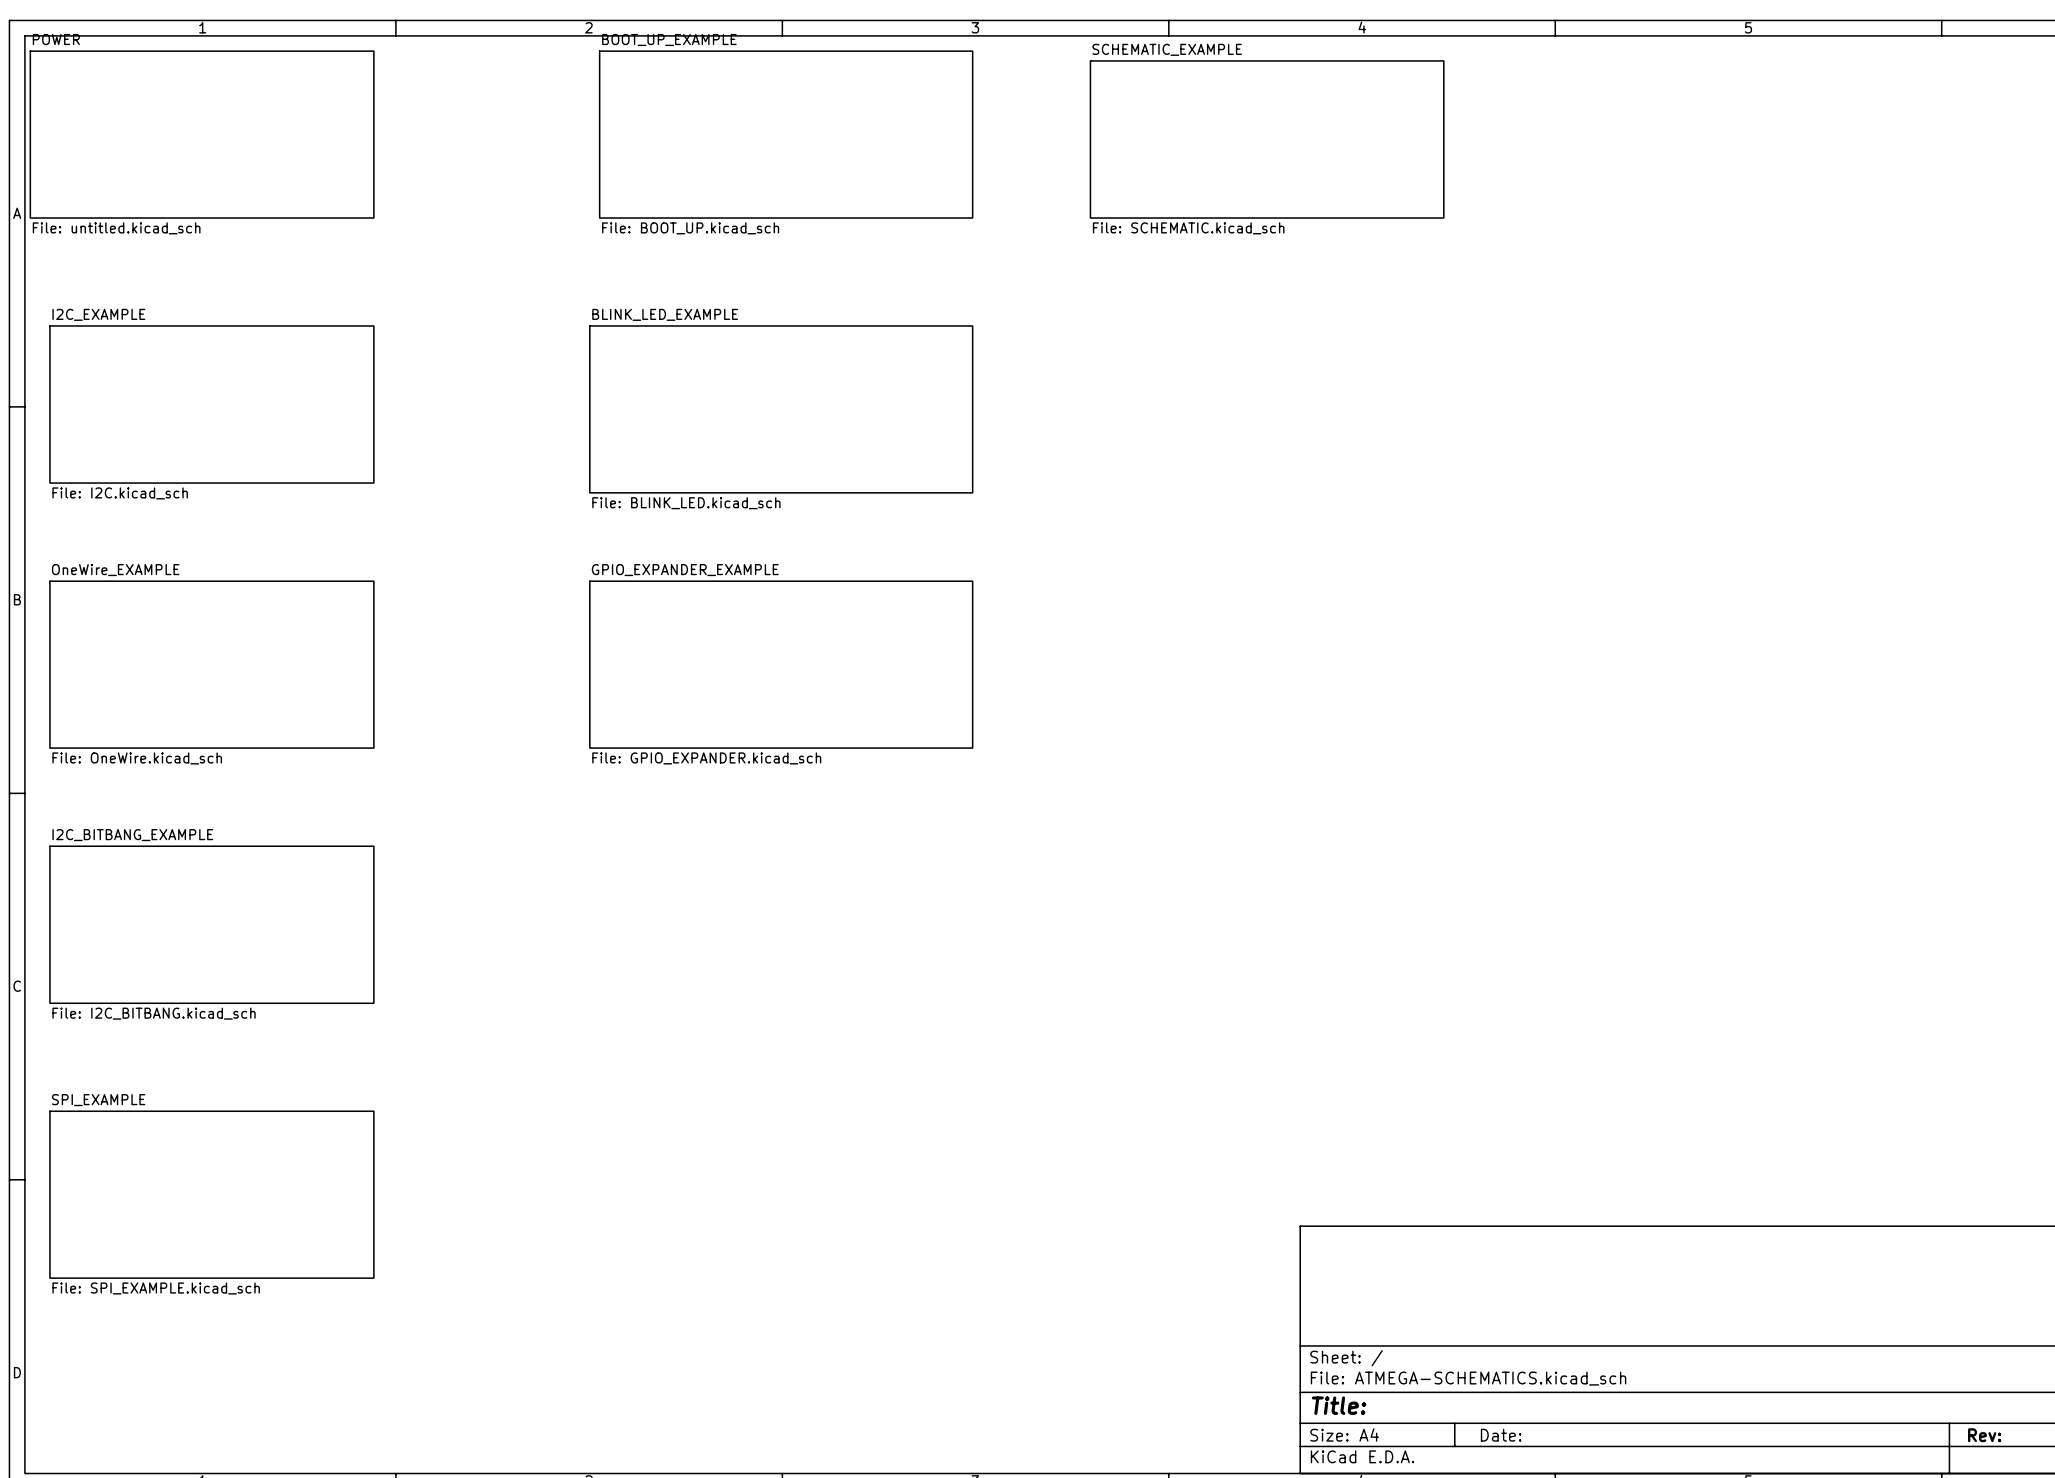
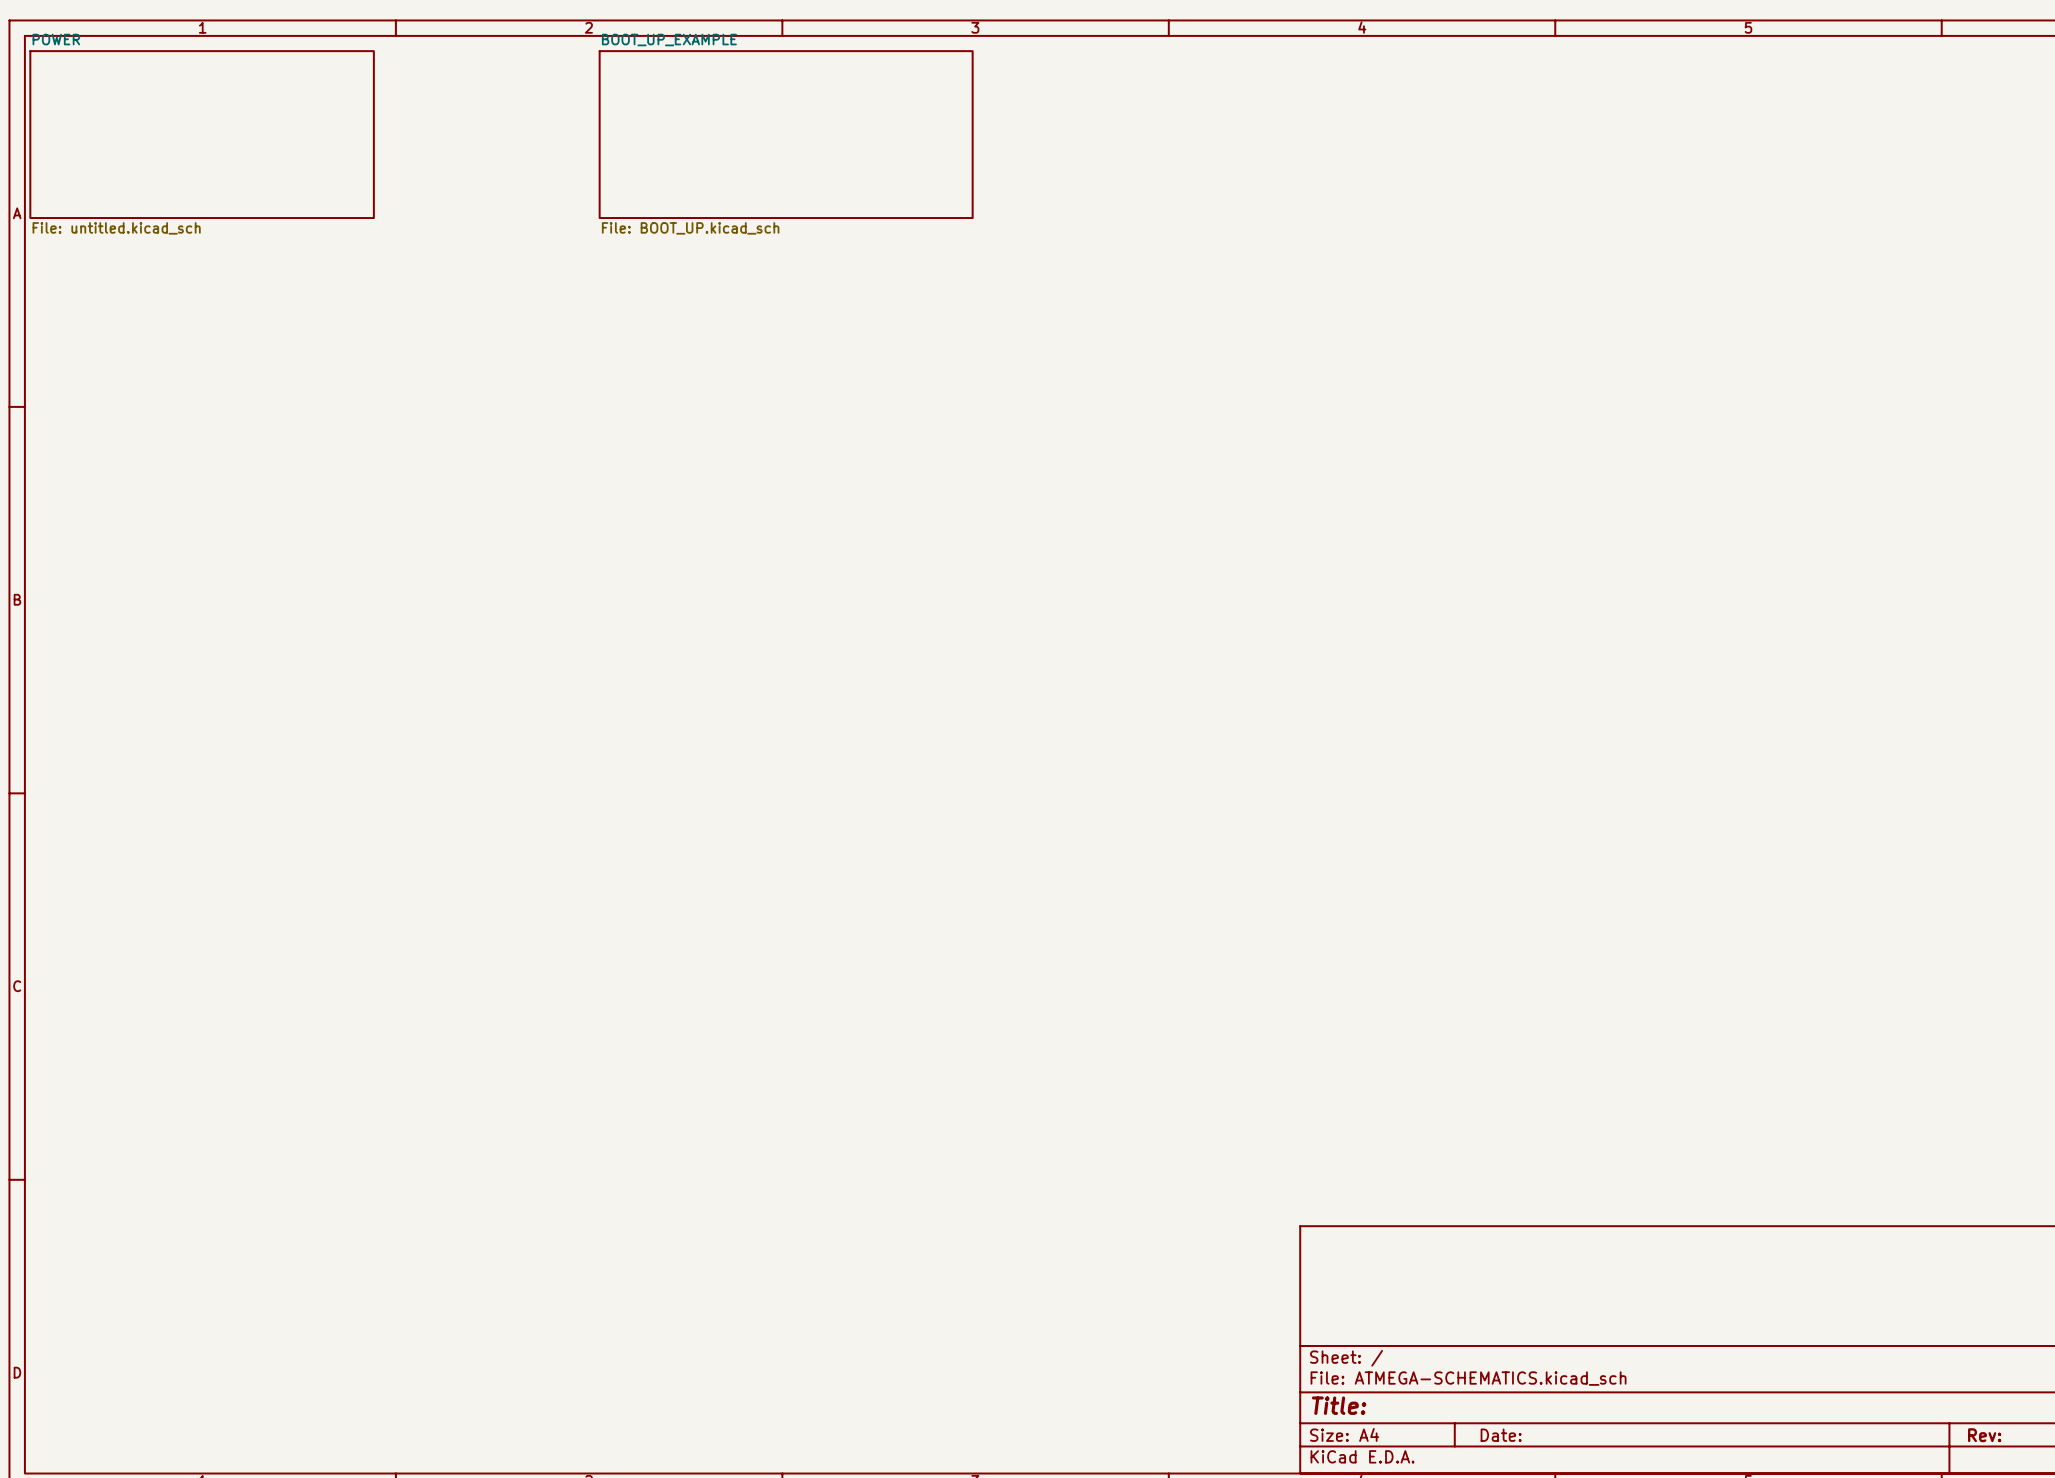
sheet SCHEMATIC_EXAMPLE: File: SCHEMATIC.kicad_sch (1267, 139) -> none
sheet I2C_EXAMPLE: File: I2C.kicad_sch (211, 404) -> none
sheet BLINK_LED_EXAMPLE: File: BLINK_LED.kicad_sch (781, 409) -> none
sheet OneWire_EXAMPLE: File: OneWire.kicad_sch (211, 664) -> none
sheet GPIO_EXPANDER_EXAMPLE: File: GPIO_EXPANDER.kicad_sch (781, 664) -> none
sheet I2C_BITBANG_EXAMPLE: File: I2C_BITBANG.kicad_sch (211, 924) -> none
sheet SPI_EXAMPLE: File: SPI_EXAMPLE.kicad_sch (211, 1194) -> none

